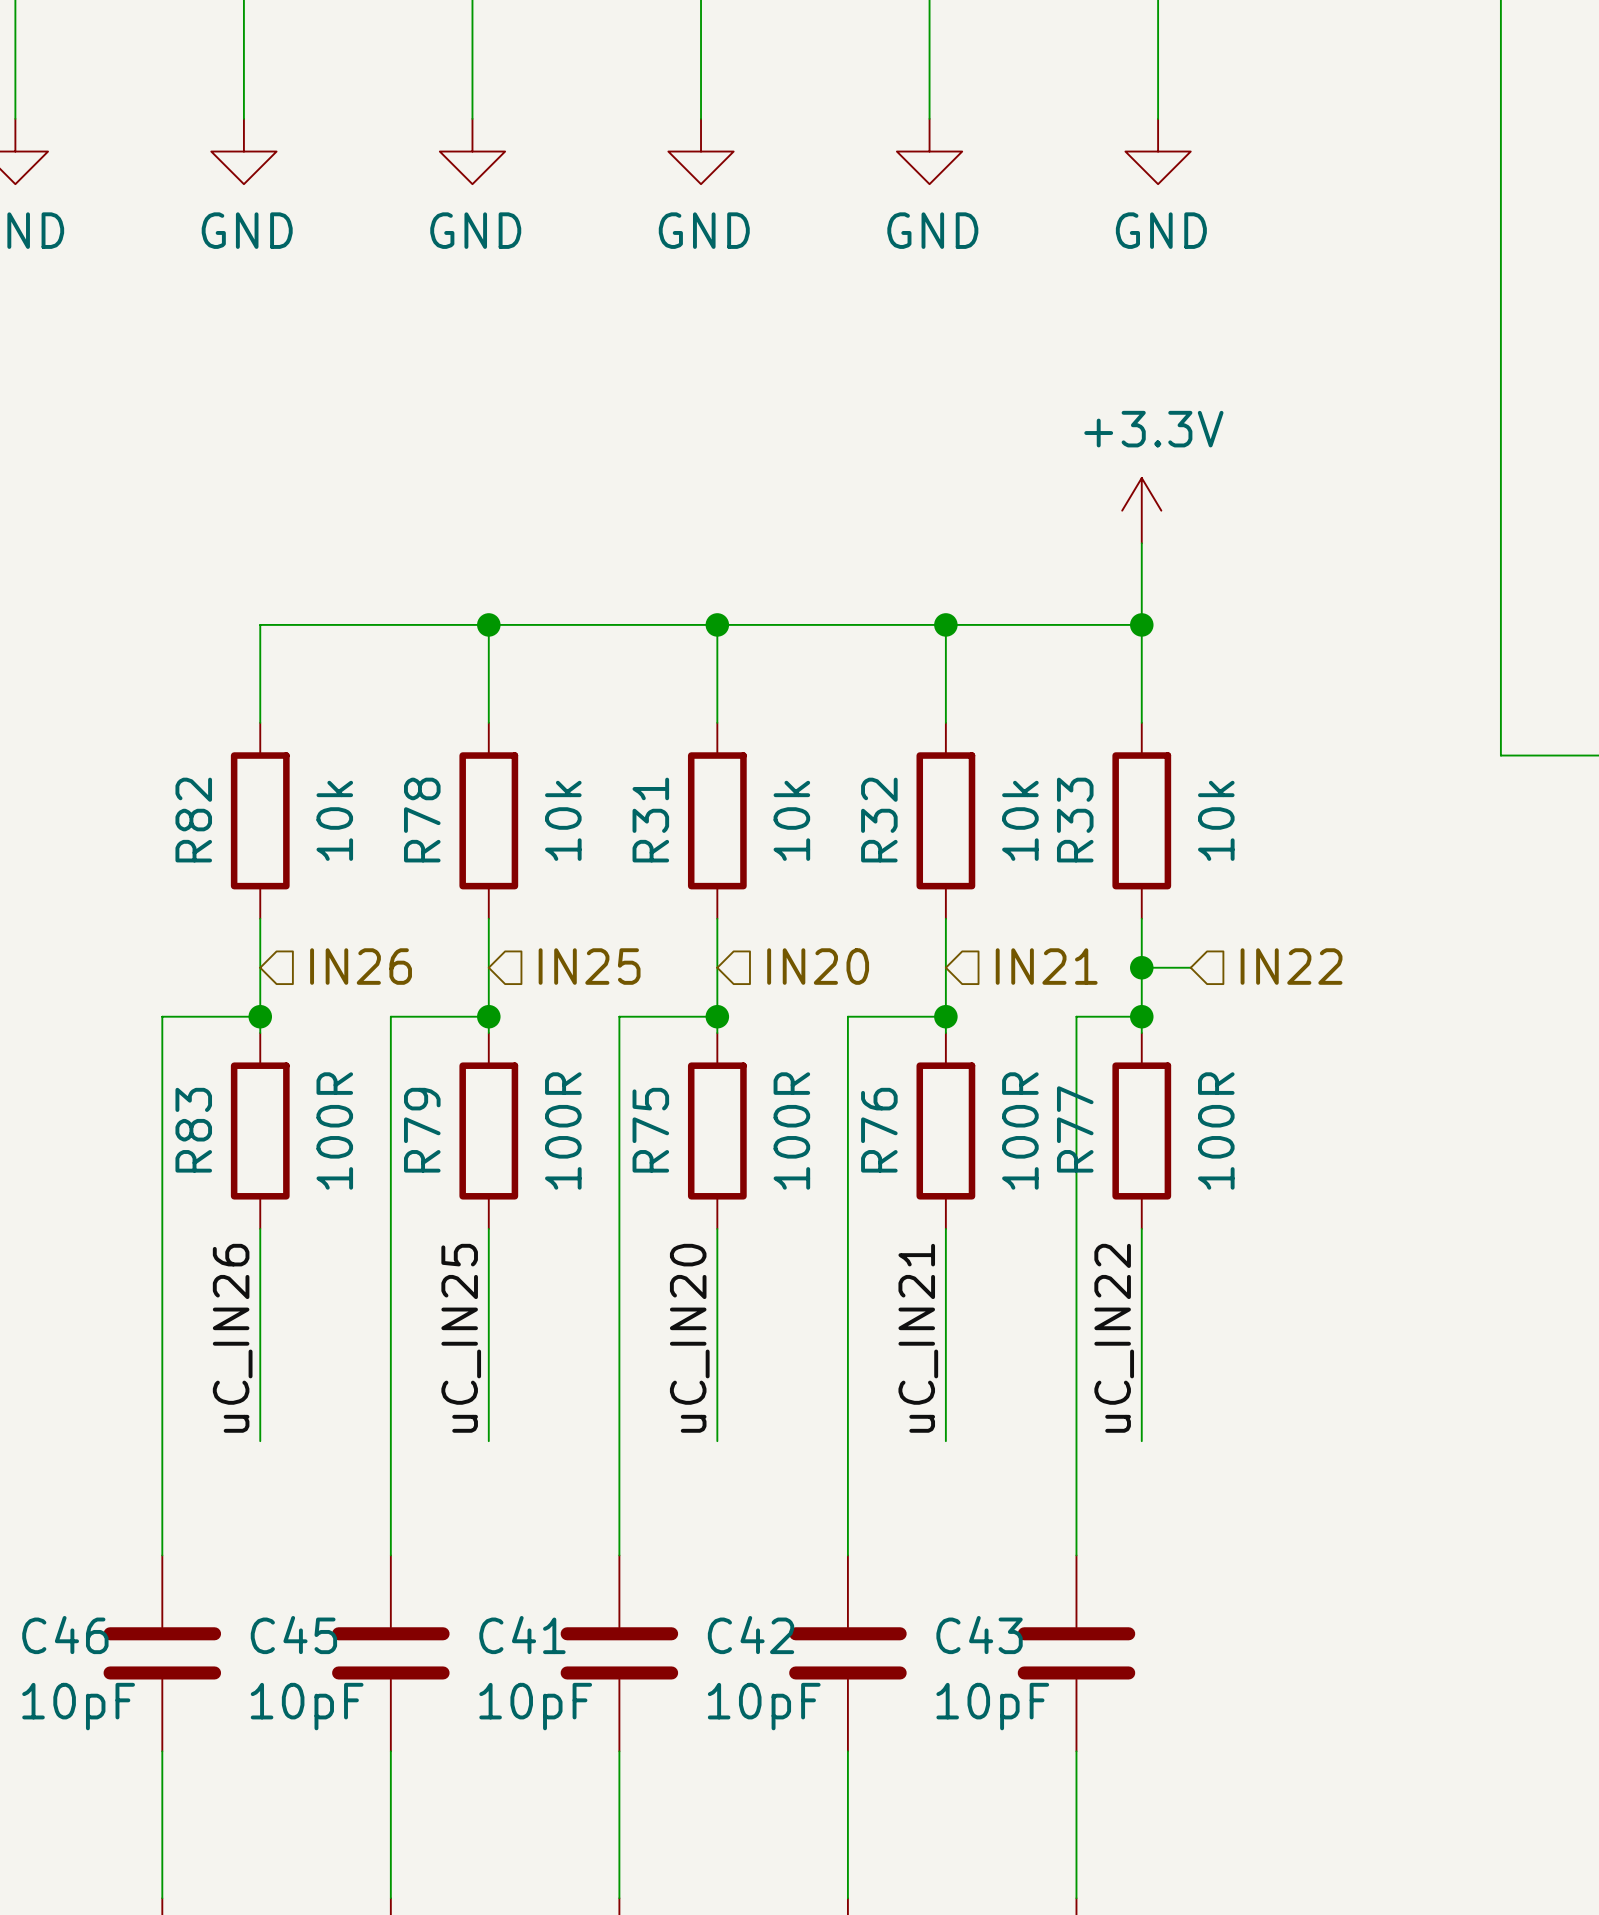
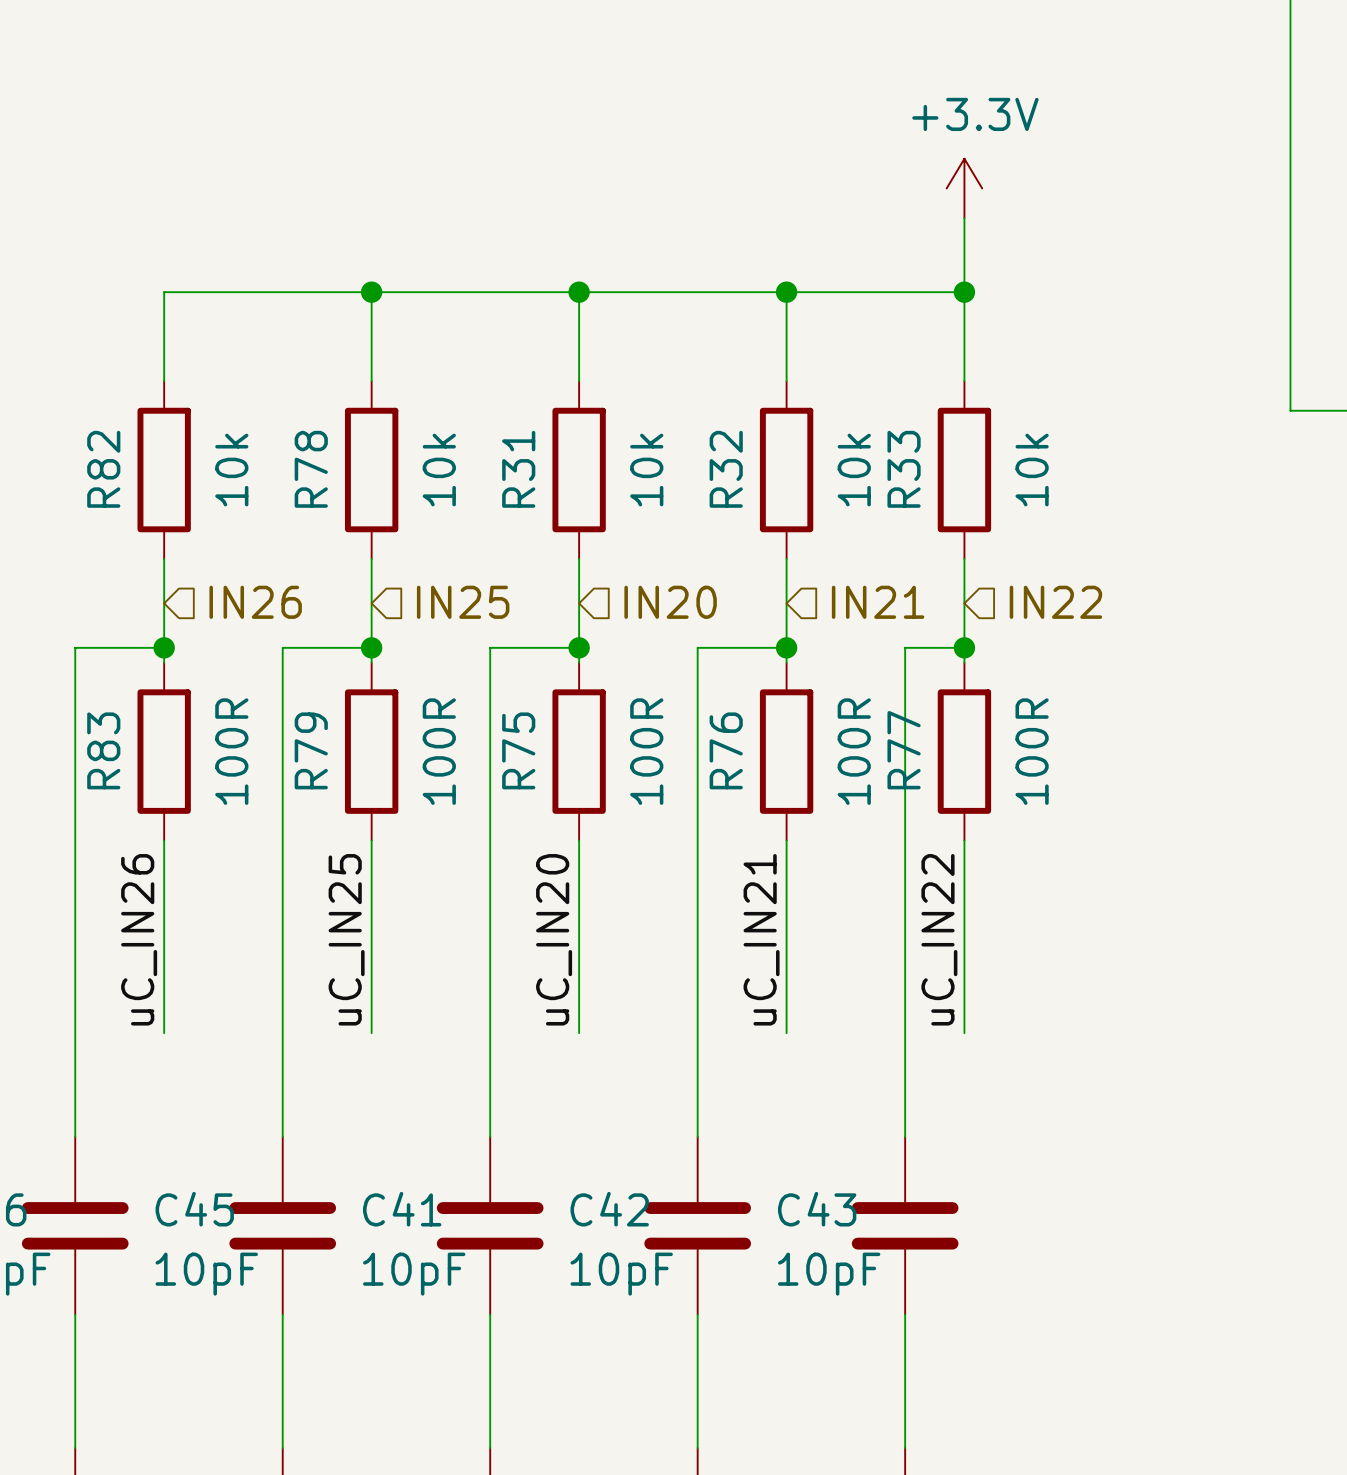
hierarchical label position: IN22 (1291, 966) -> IN22 (1055, 602)
wire: (1141, 967) (1190, 967) -> none
junction: (1141, 967) -> none

